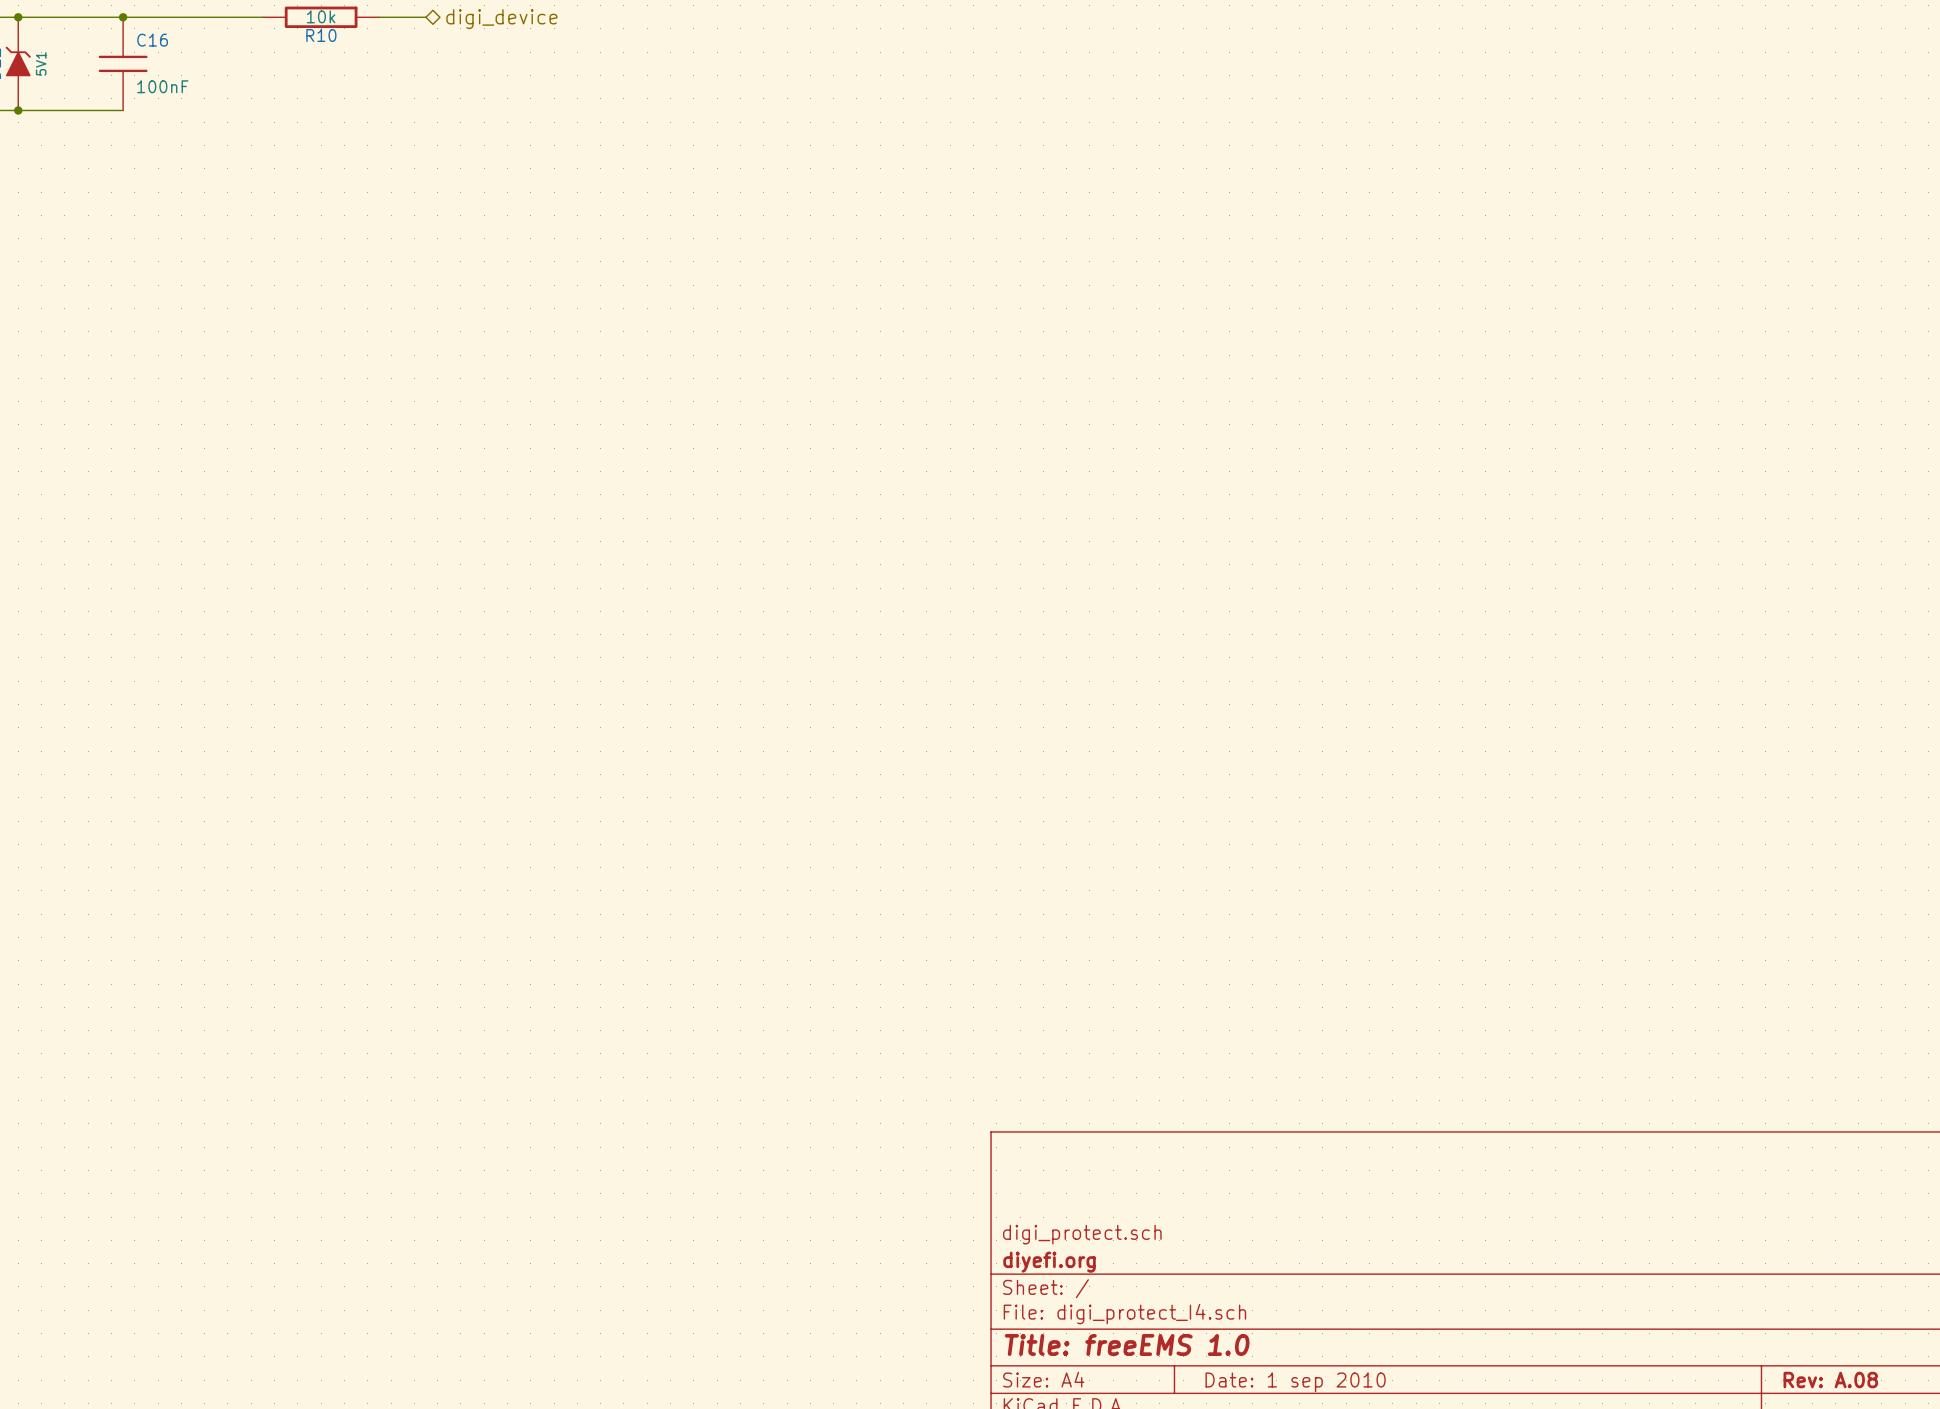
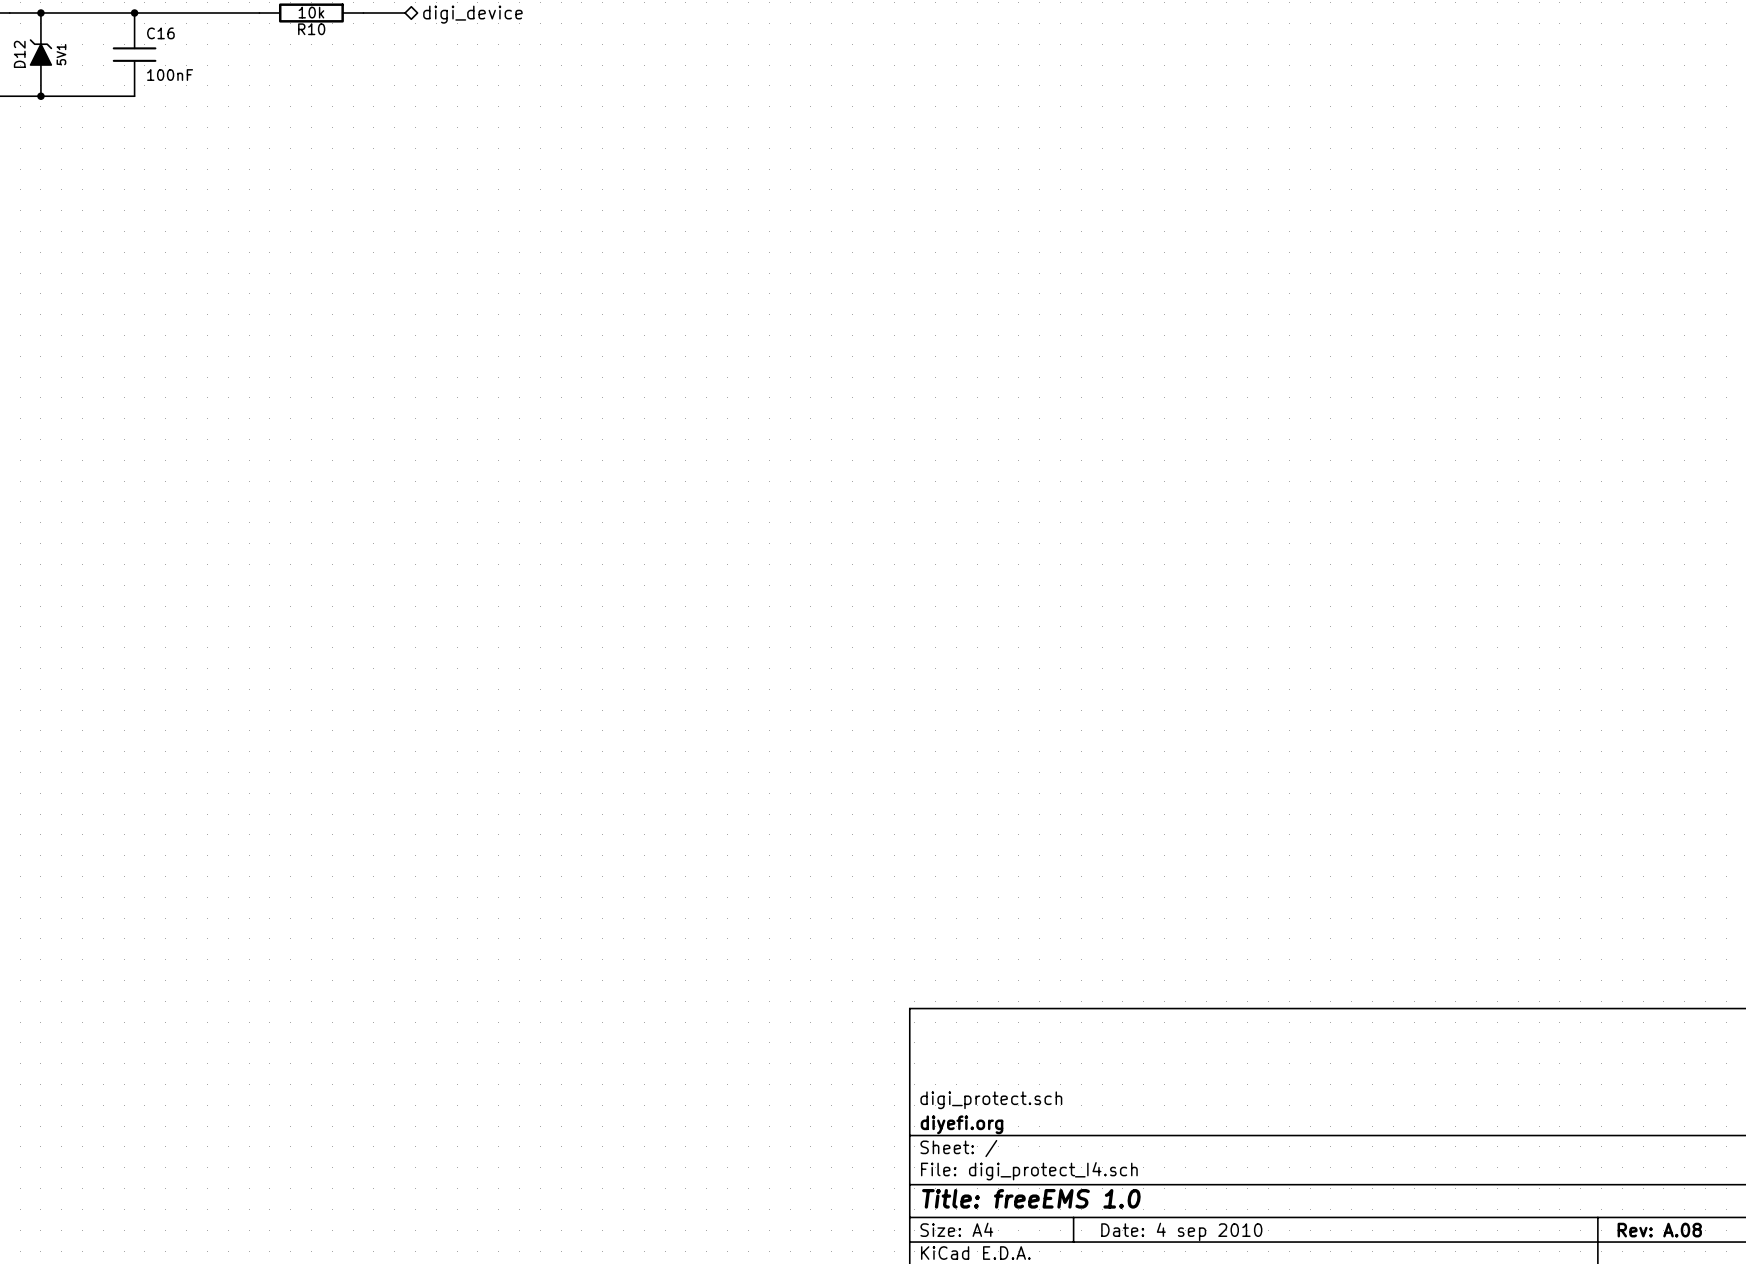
title block: Date: 1 sep 2010 (1295, 1382) -> Date: 4 sep 2010 (1181, 1231)

